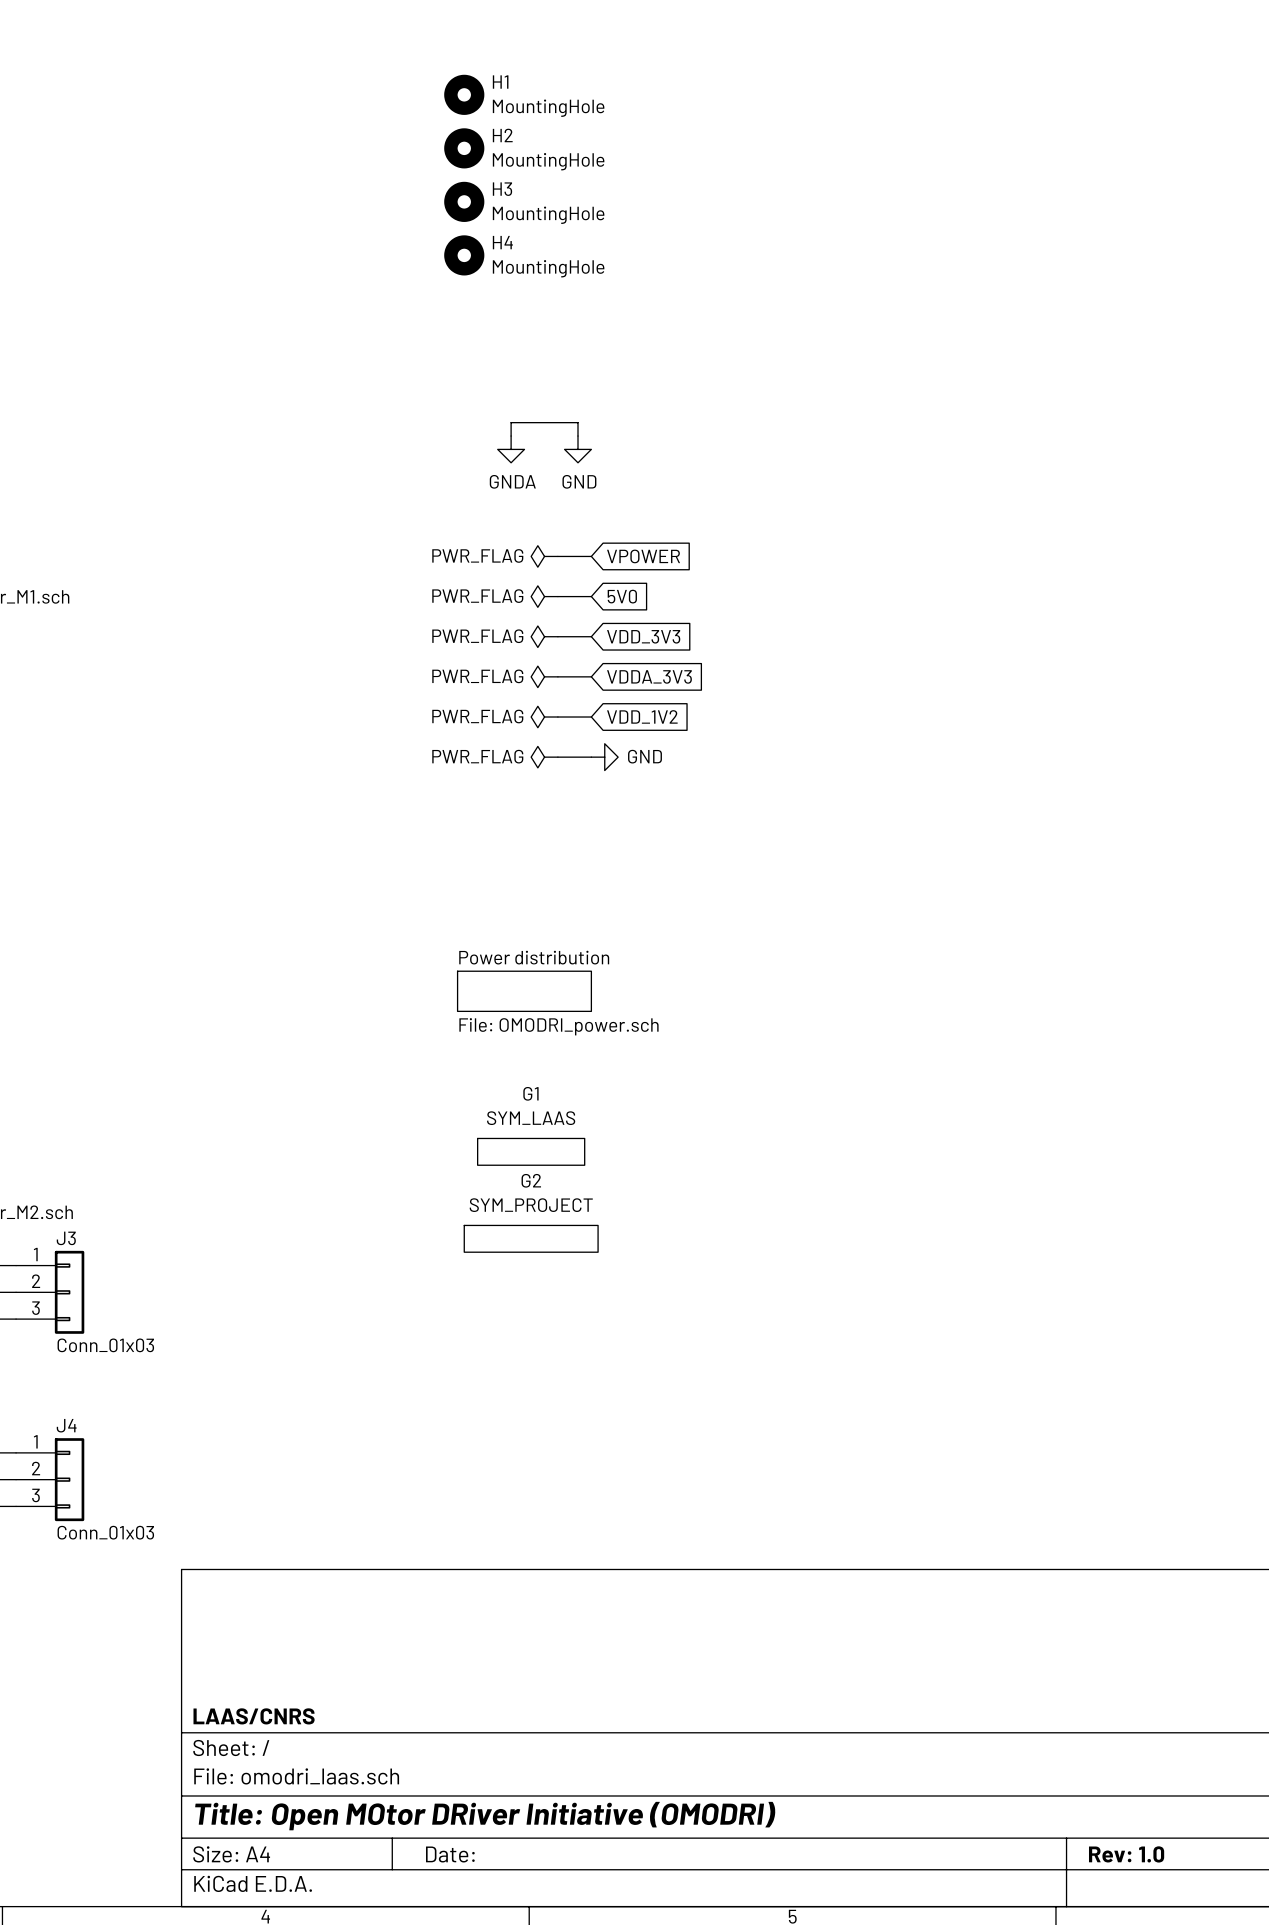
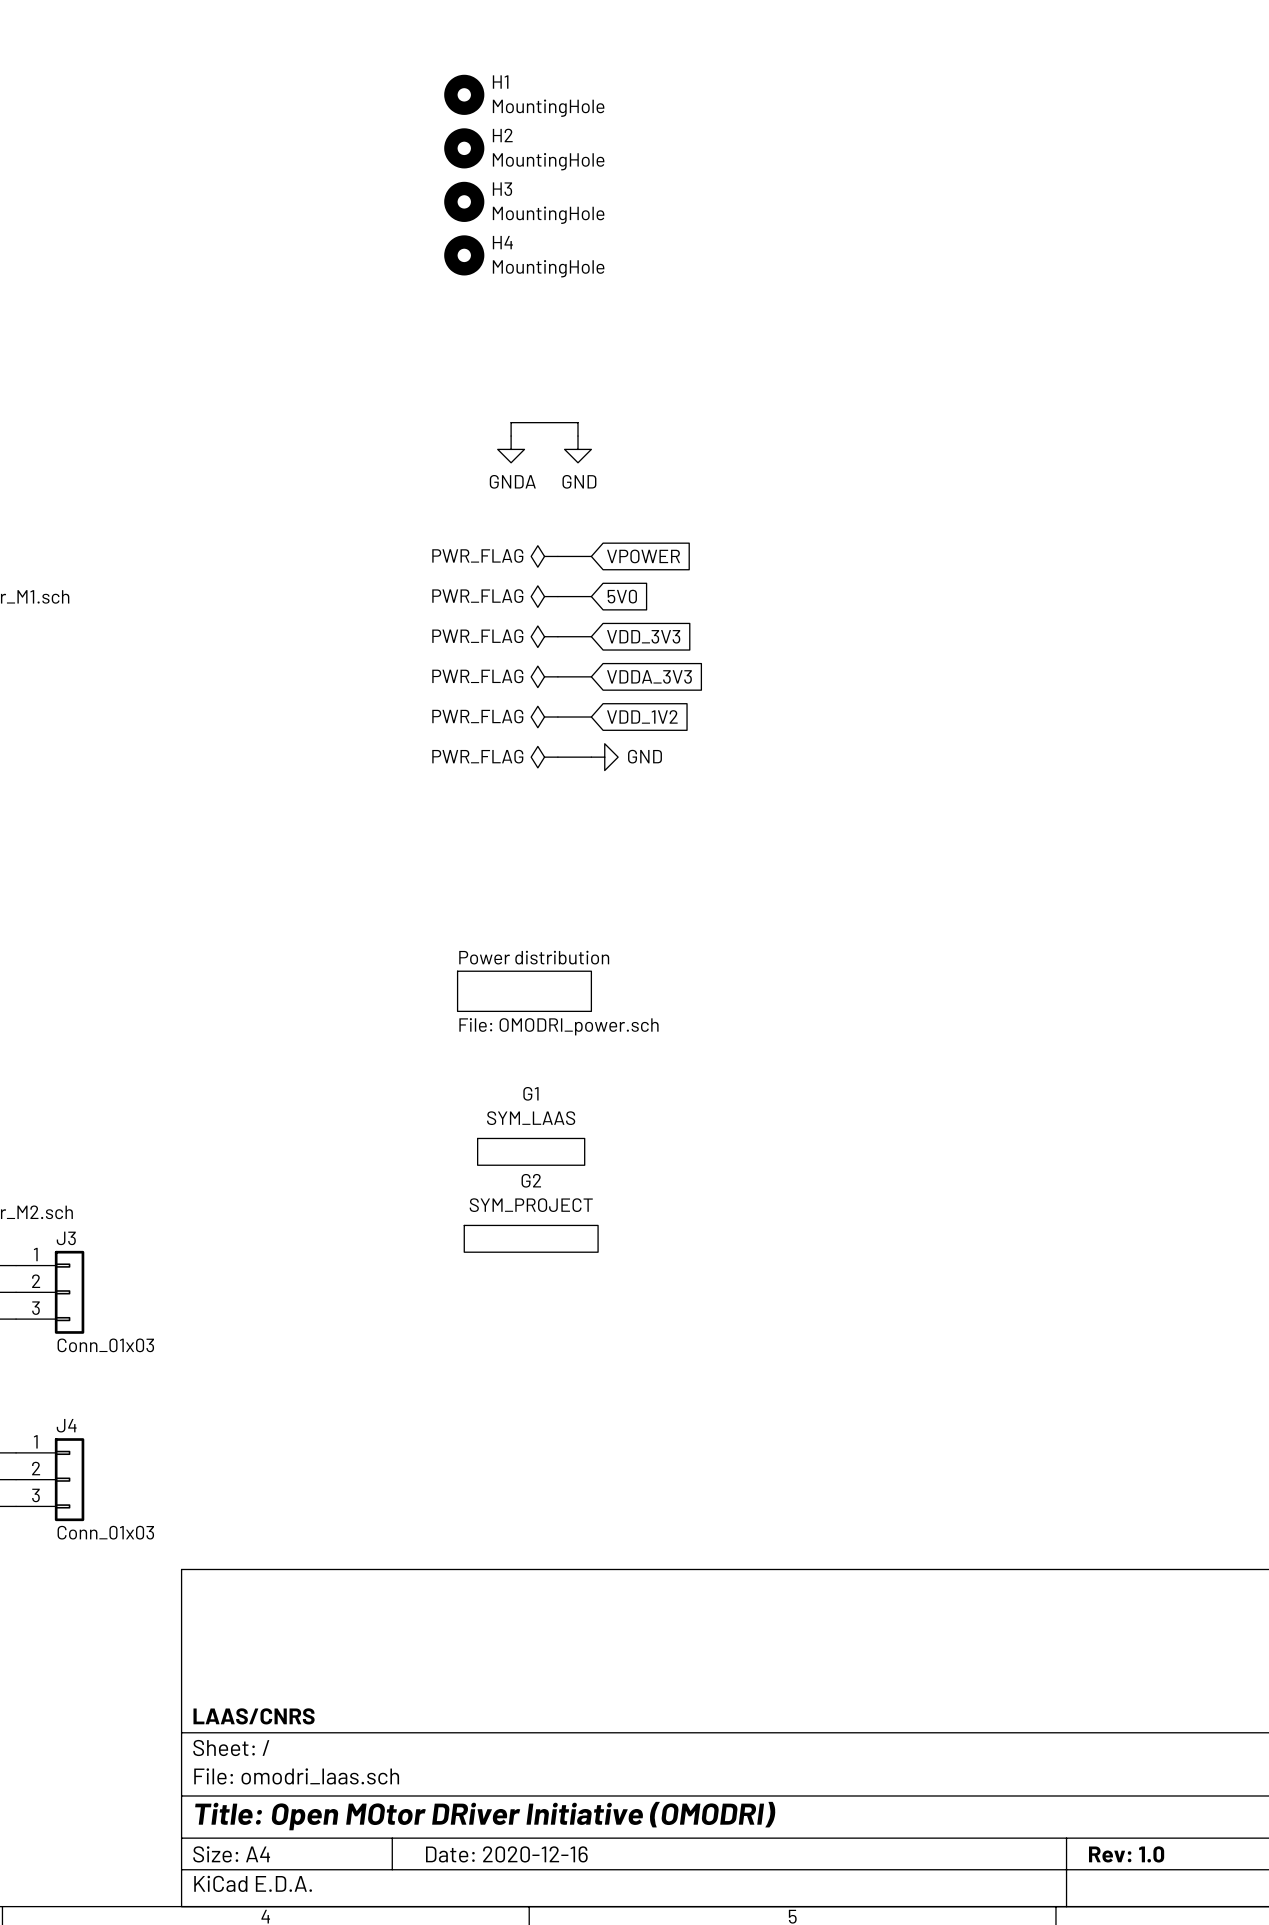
title block: Date: (450, 1854) -> Date: 2020-12-16 (506, 1854)

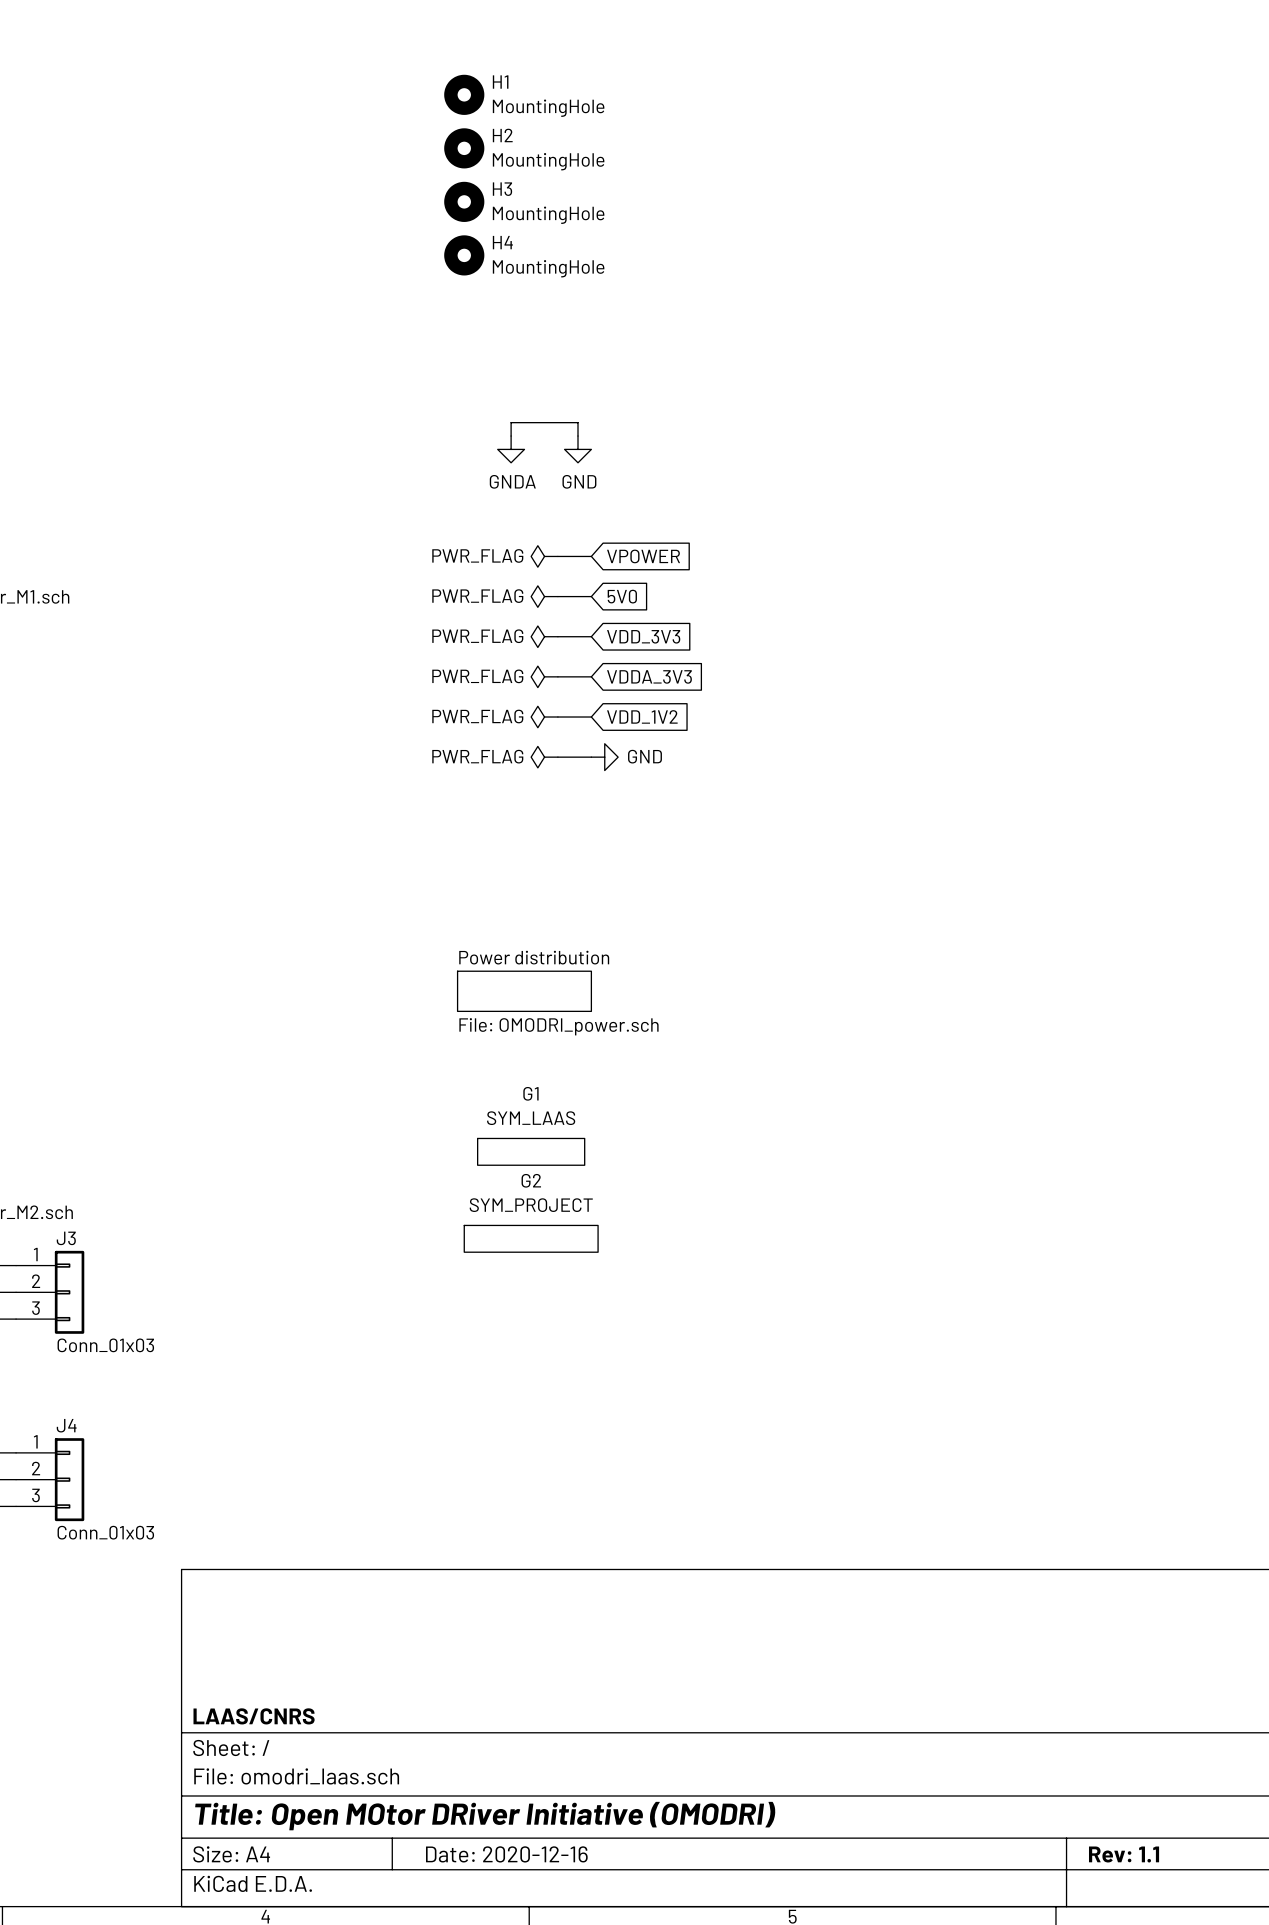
title block: Rev: 1.0 (1126, 1854) -> Rev: 1.1 (1124, 1854)

